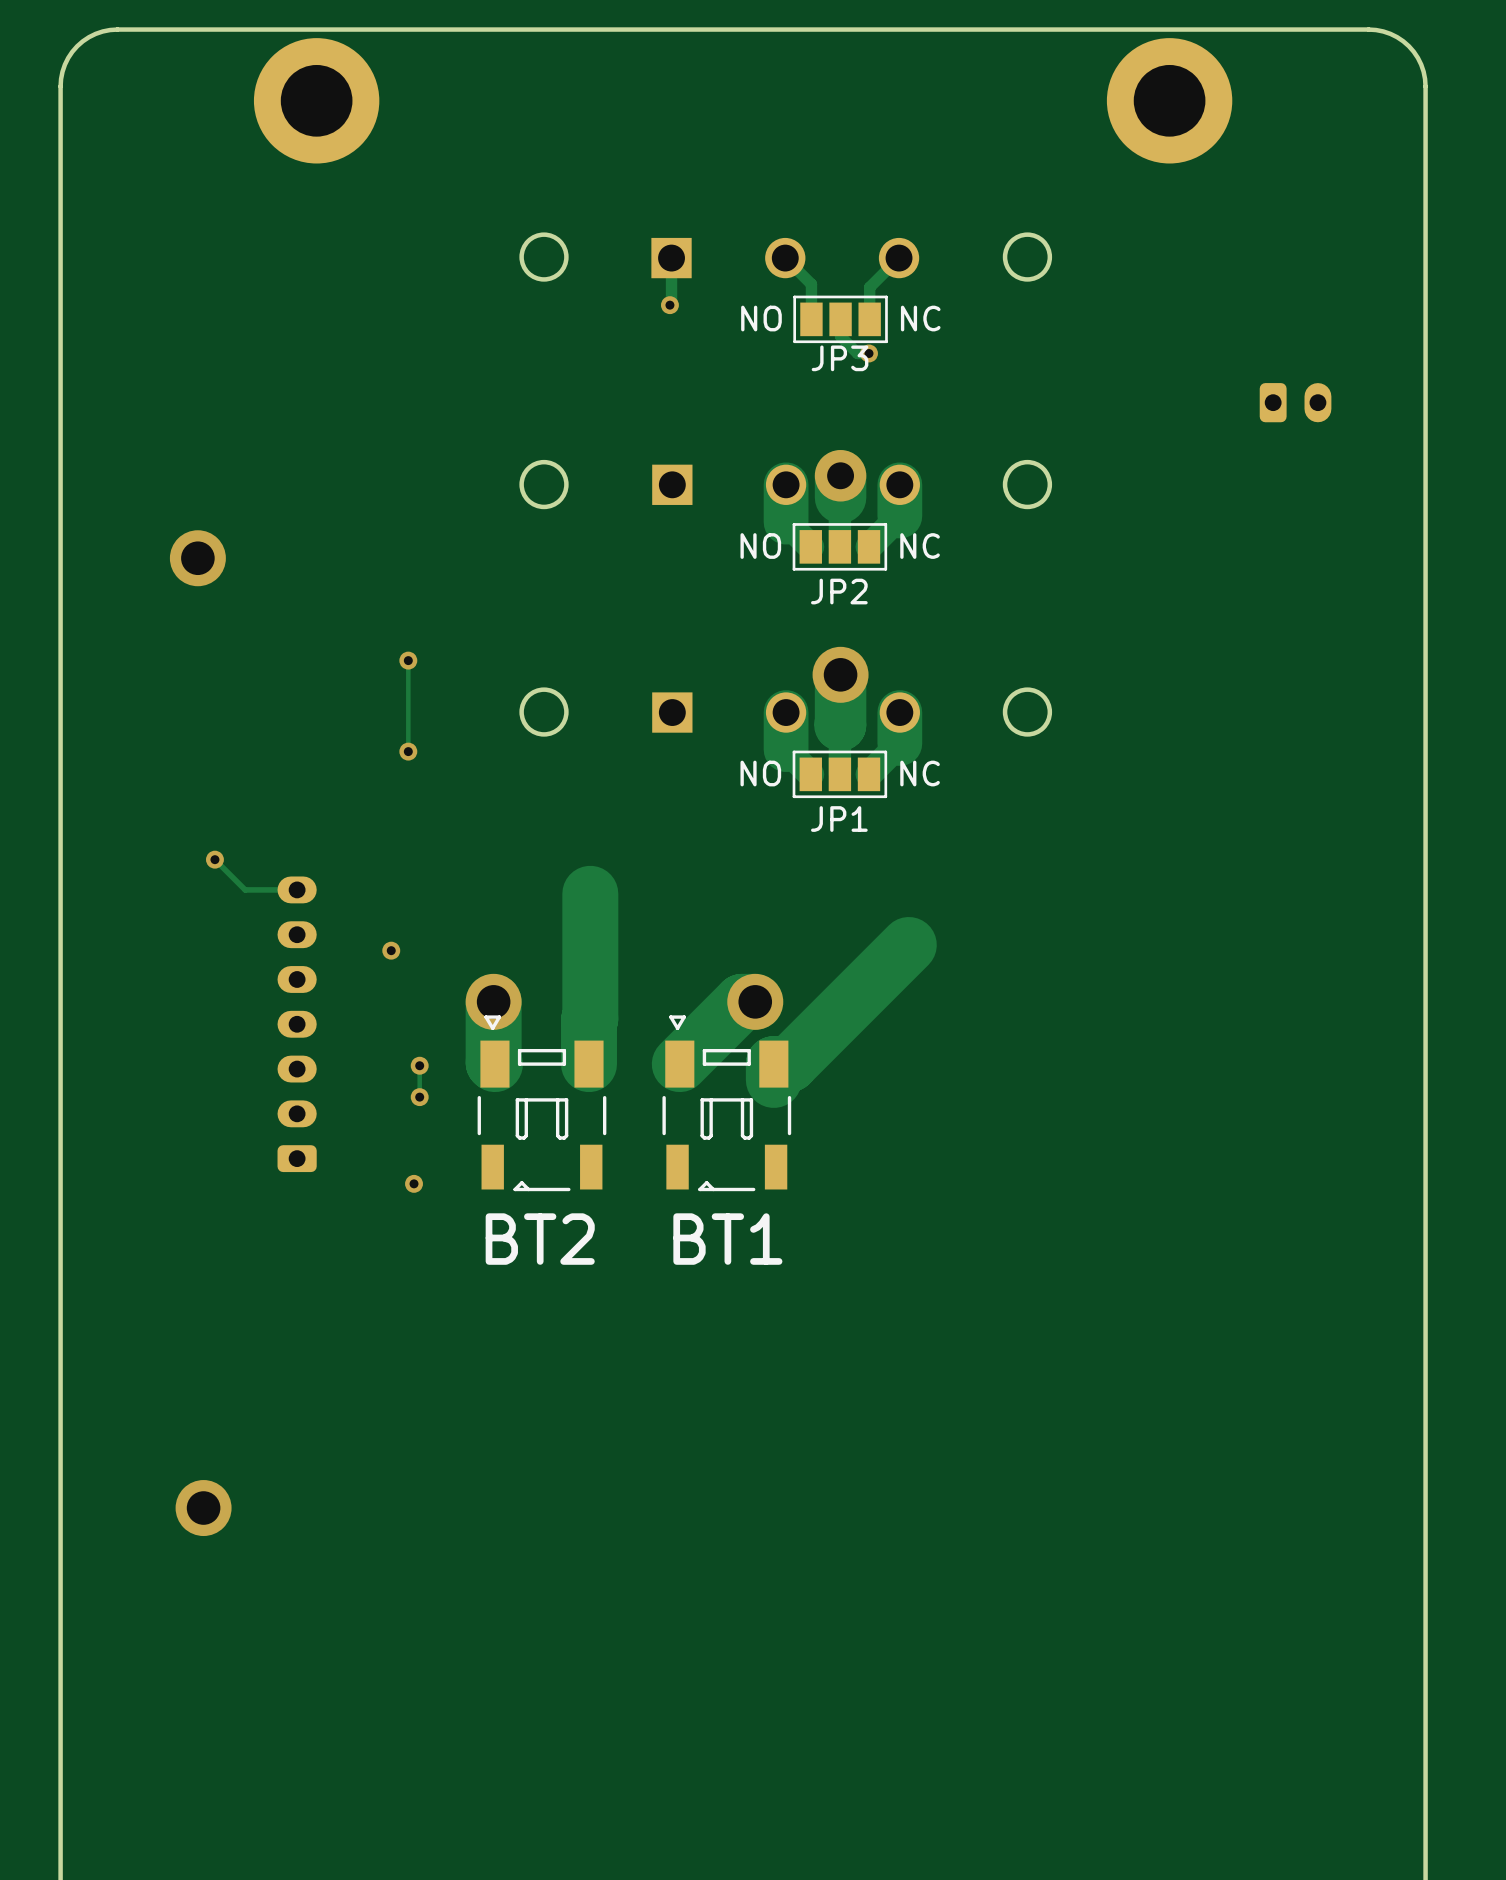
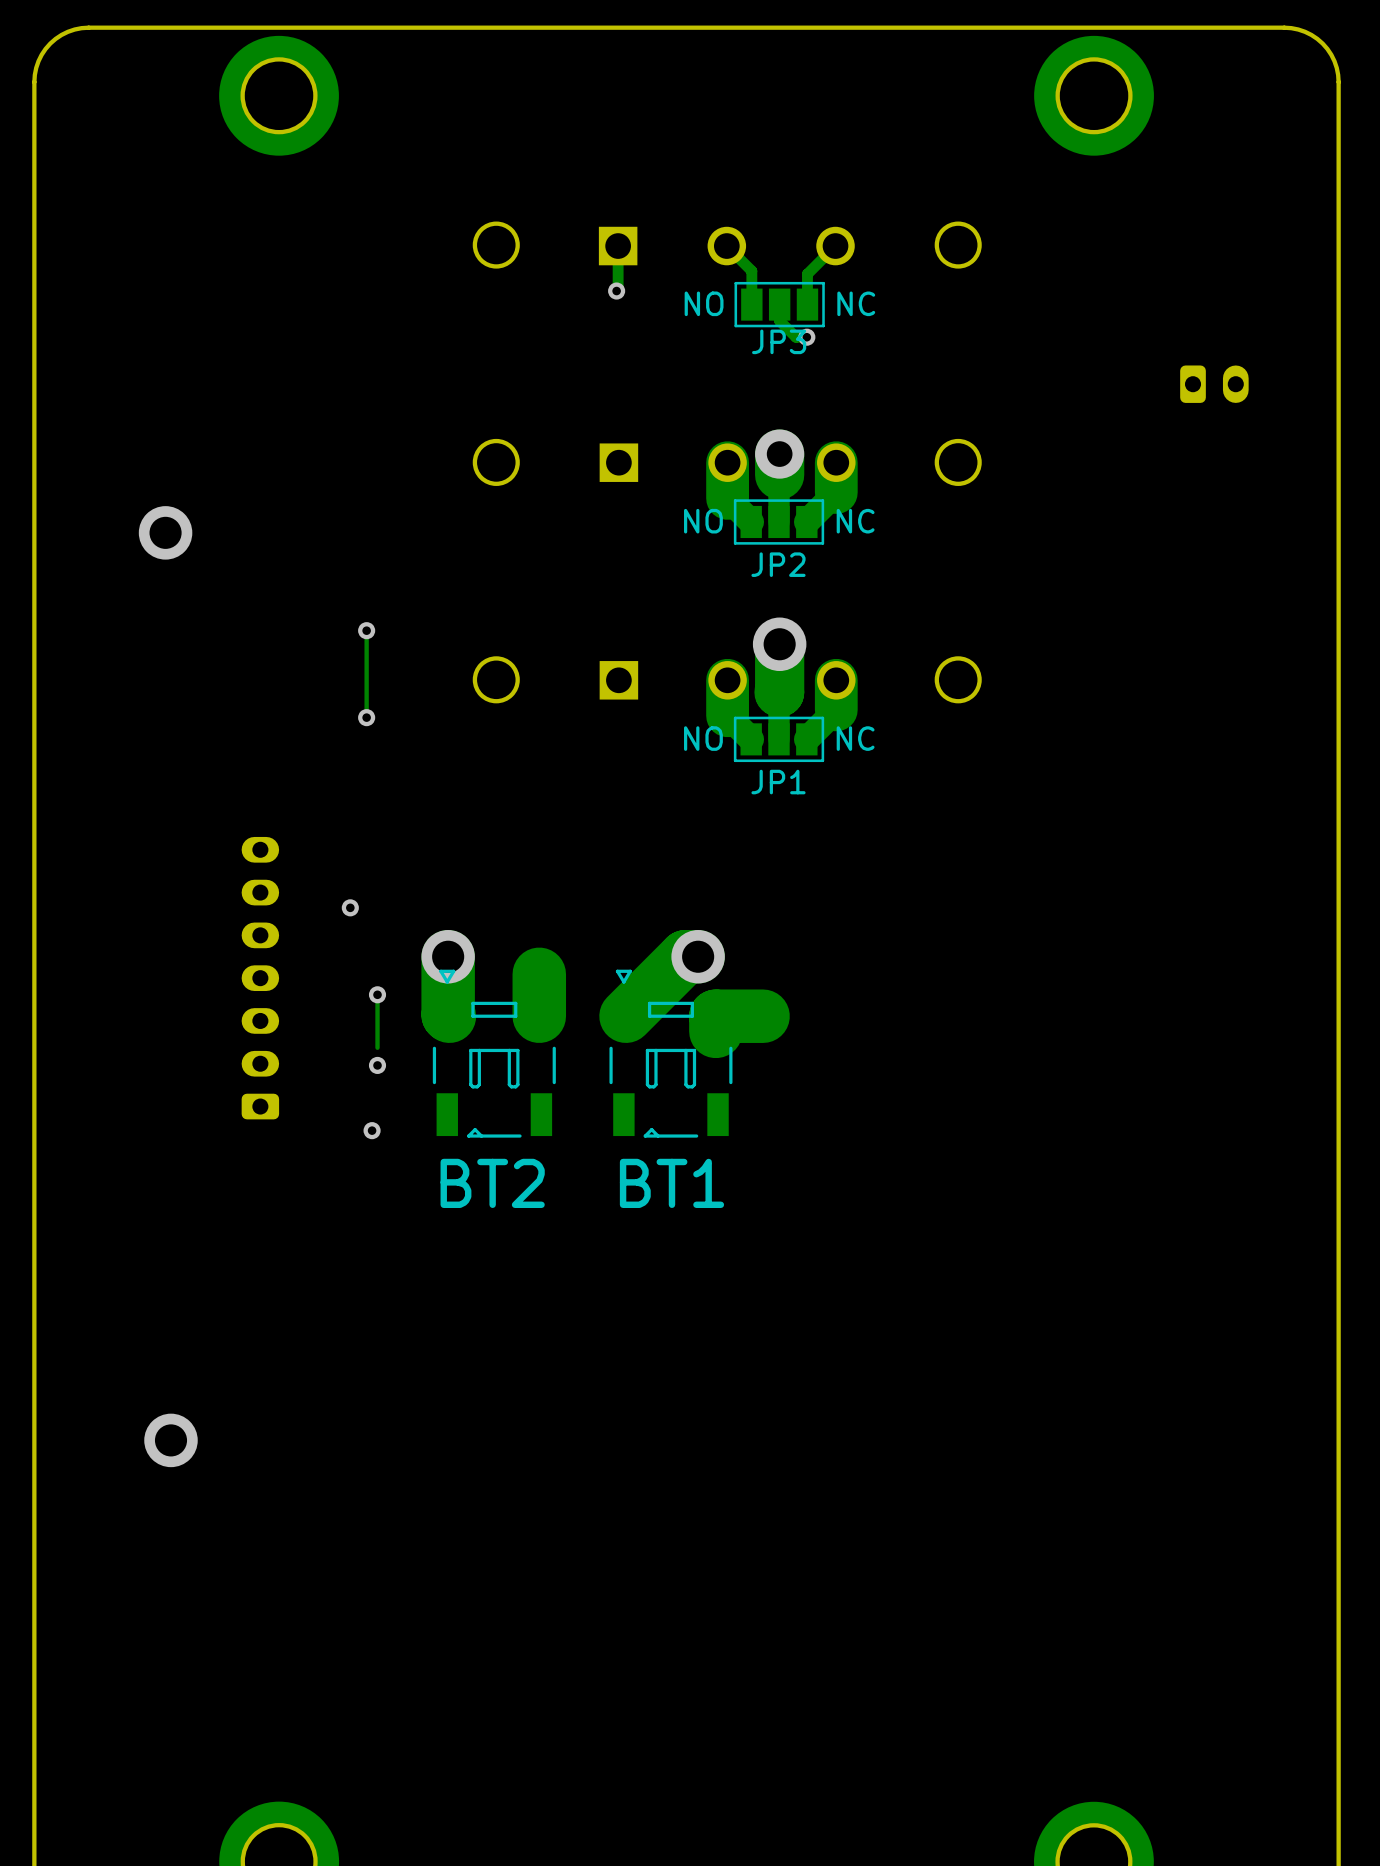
track: (214, 859) (245, 889) (297, 889) -> none
via: (214, 859) -> none
track: (590, 893) (589, 1020) -> none
track: (908, 944) (789, 1064) -> (763, 1016) (731, 1016)
track: none -> (377, 994) (377, 1017)
via position: (419, 1065) -> (377, 994)
via position: (419, 1097) -> (377, 1065)

